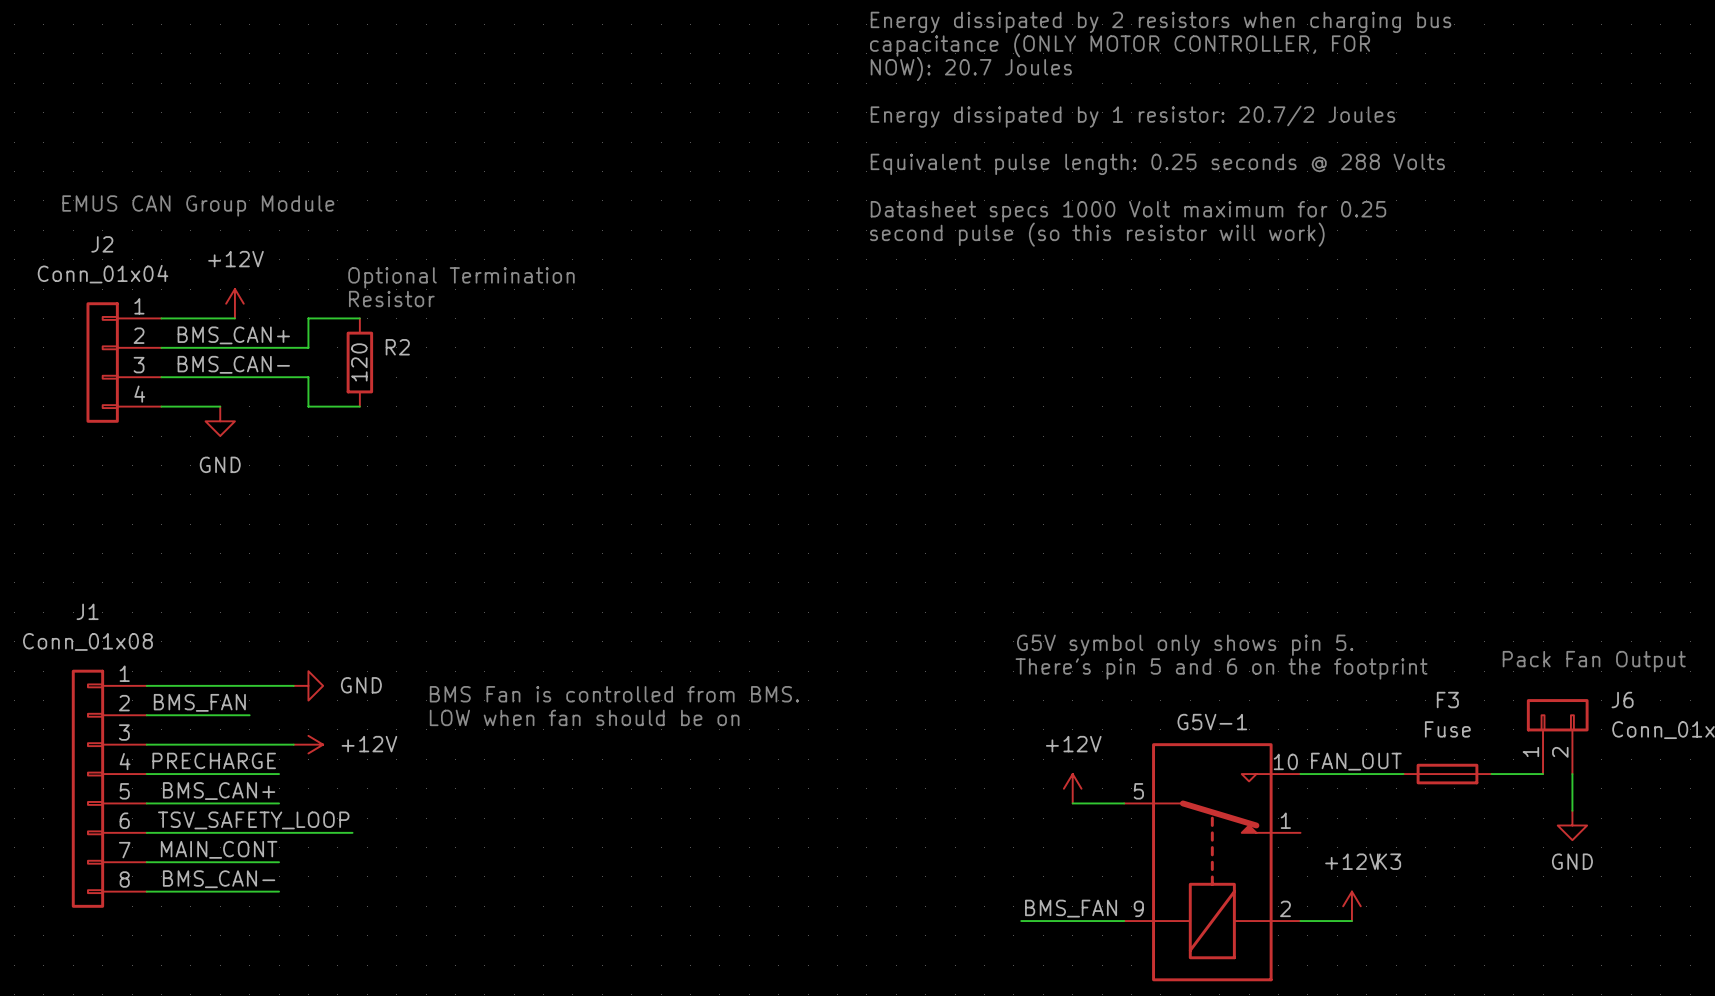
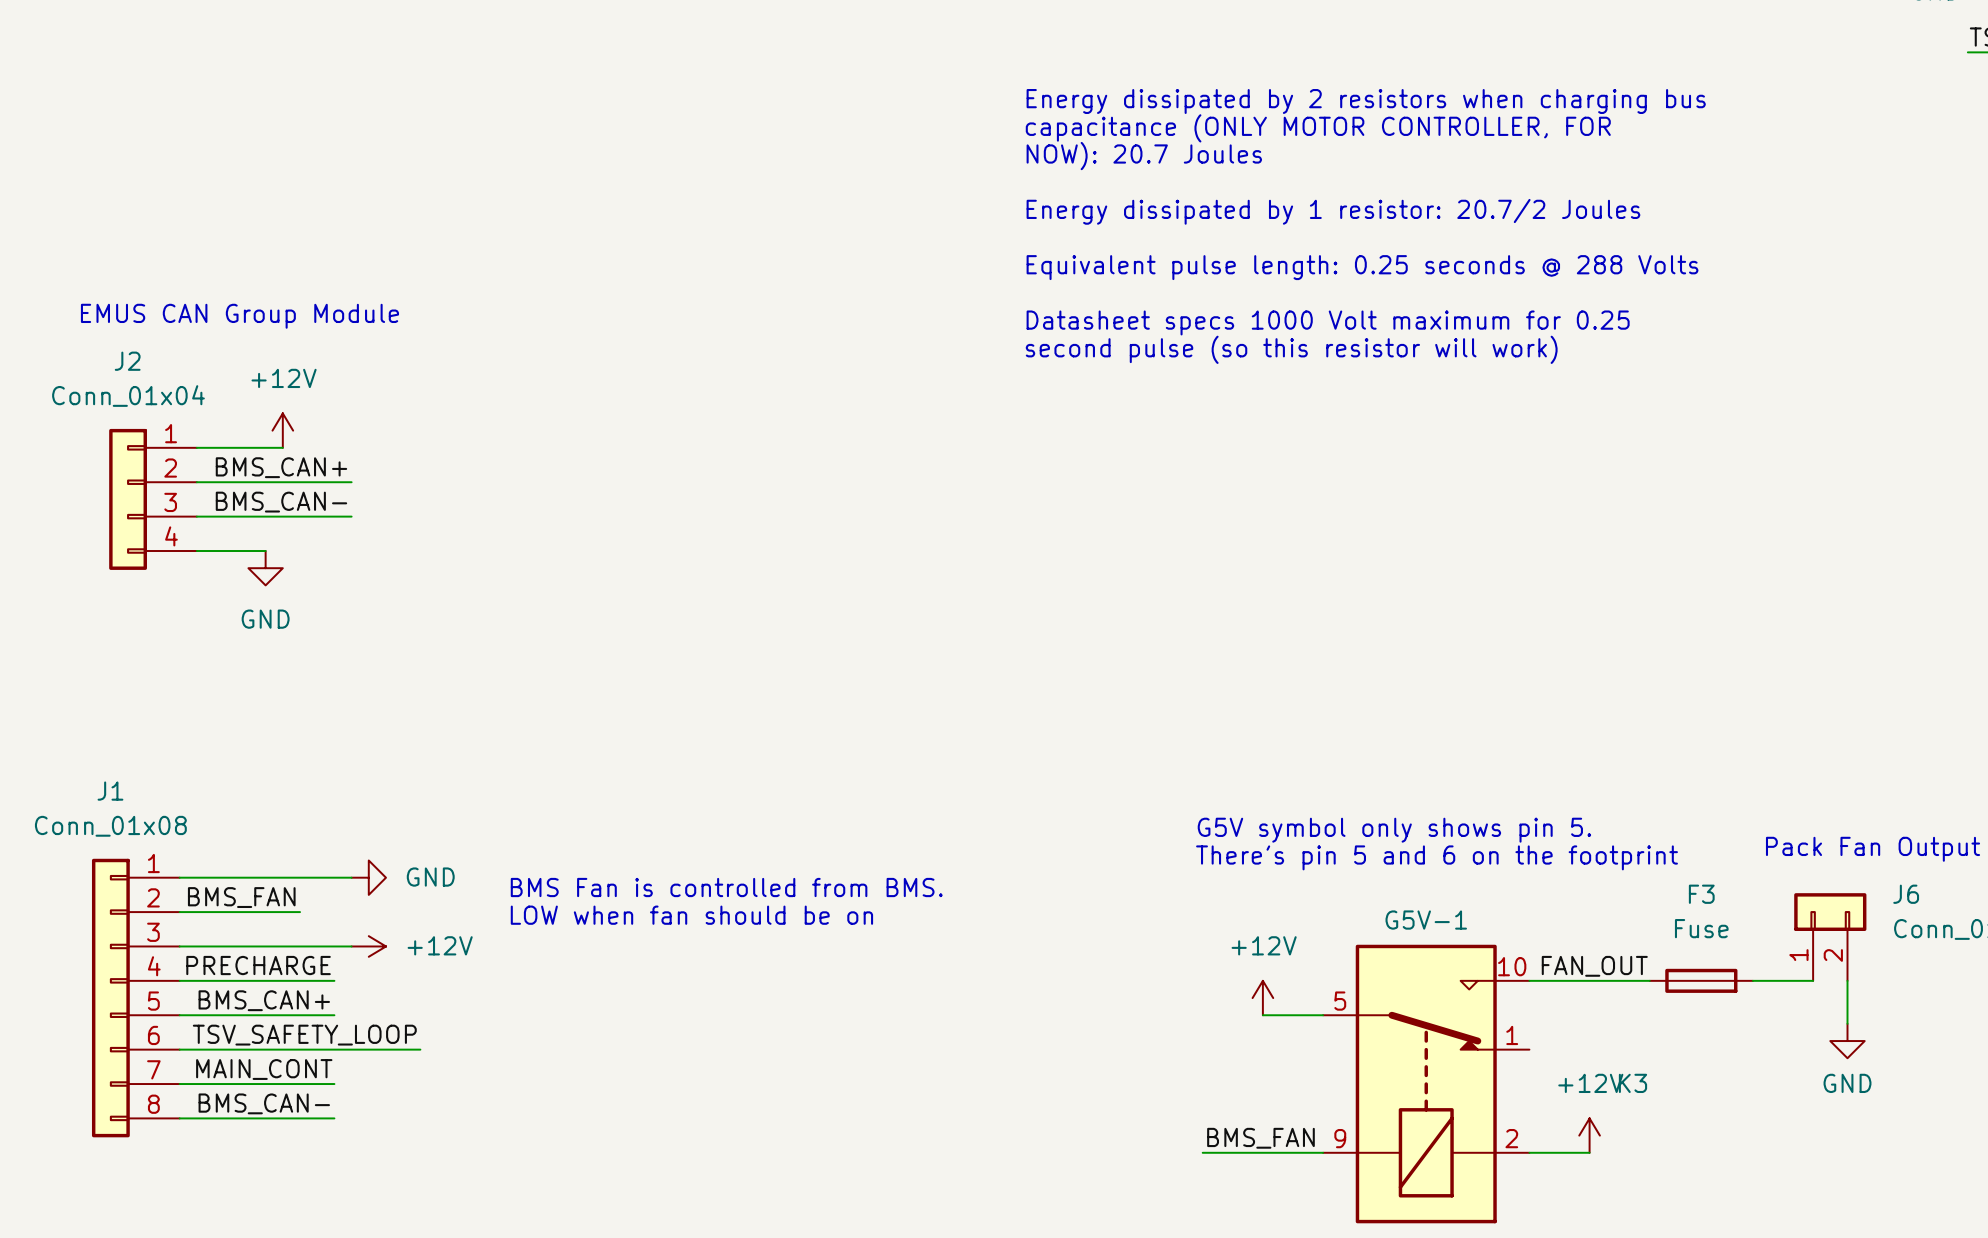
text: Optional Termination (461, 277) -> none
text: Resistor (391, 299) -> none
wire: (359, 318) (308, 318) (308, 347) (293, 347) -> none
R2: 120 (359, 362) -> none
wire: (293, 377) (308, 377) (308, 406) (359, 406) -> none

